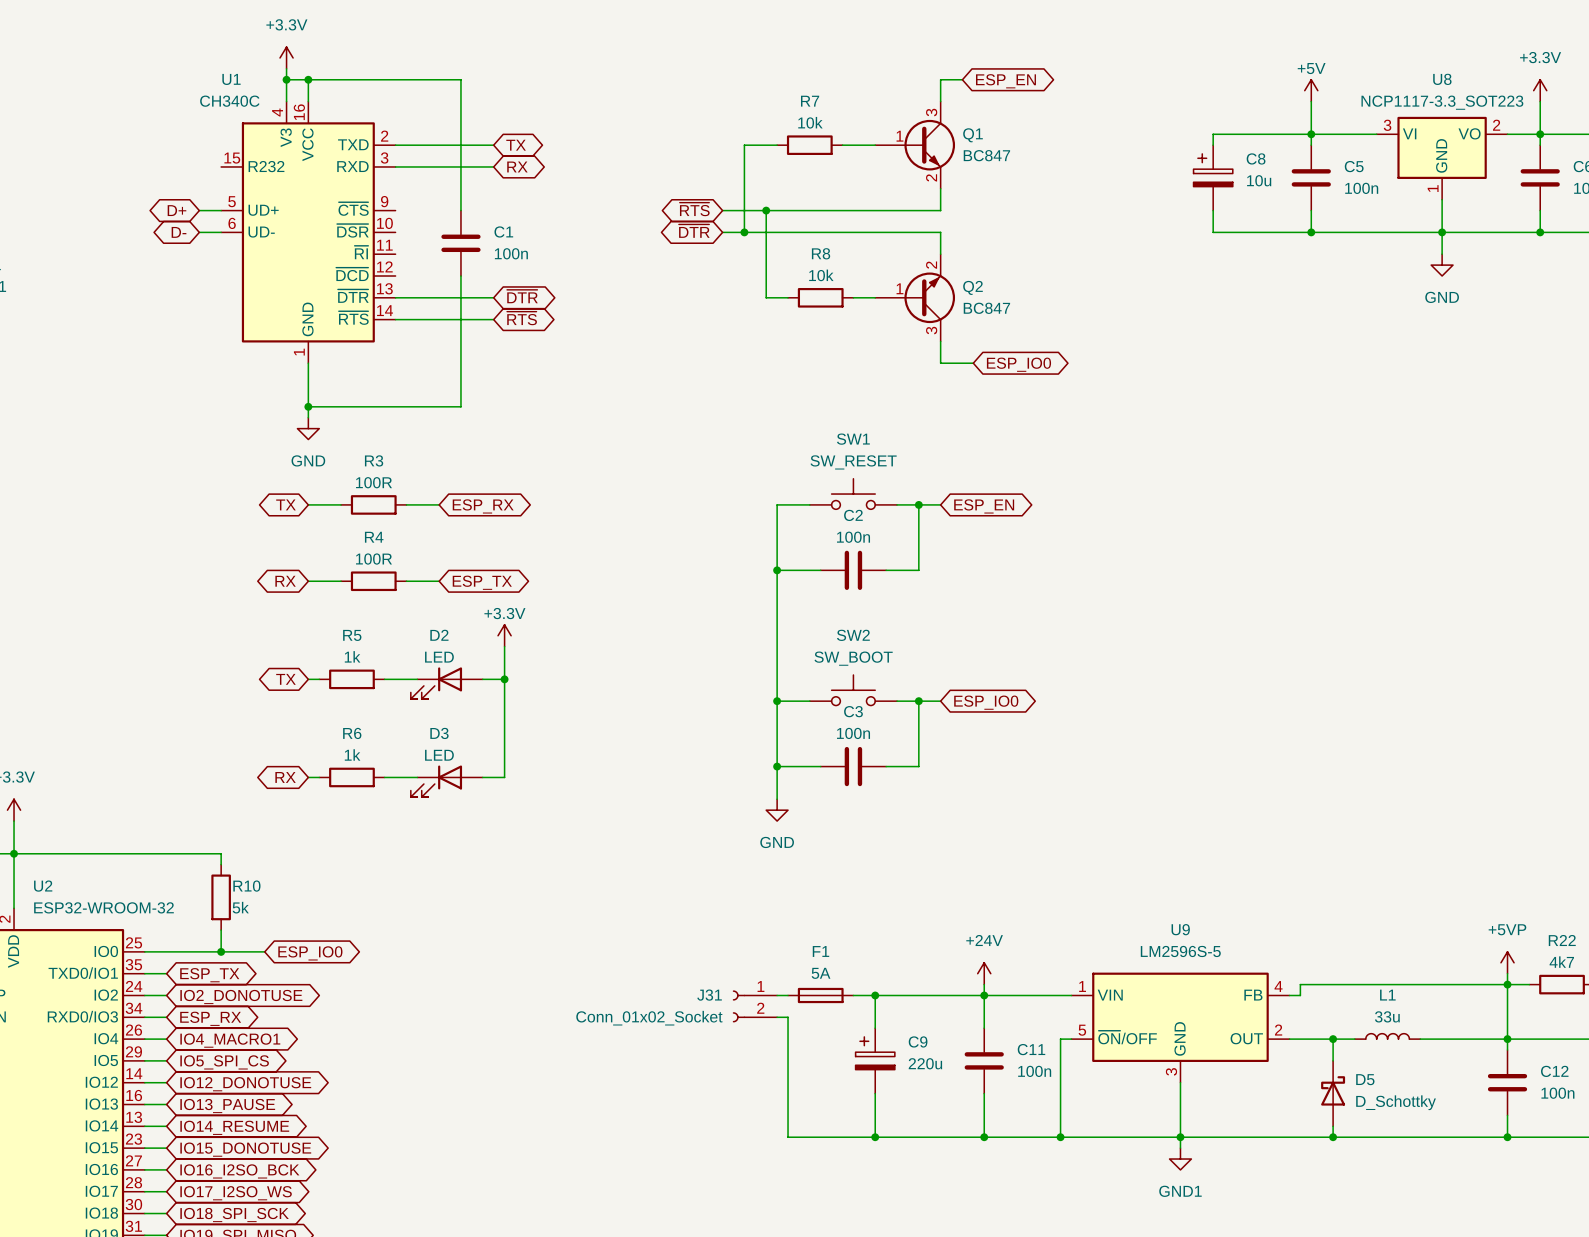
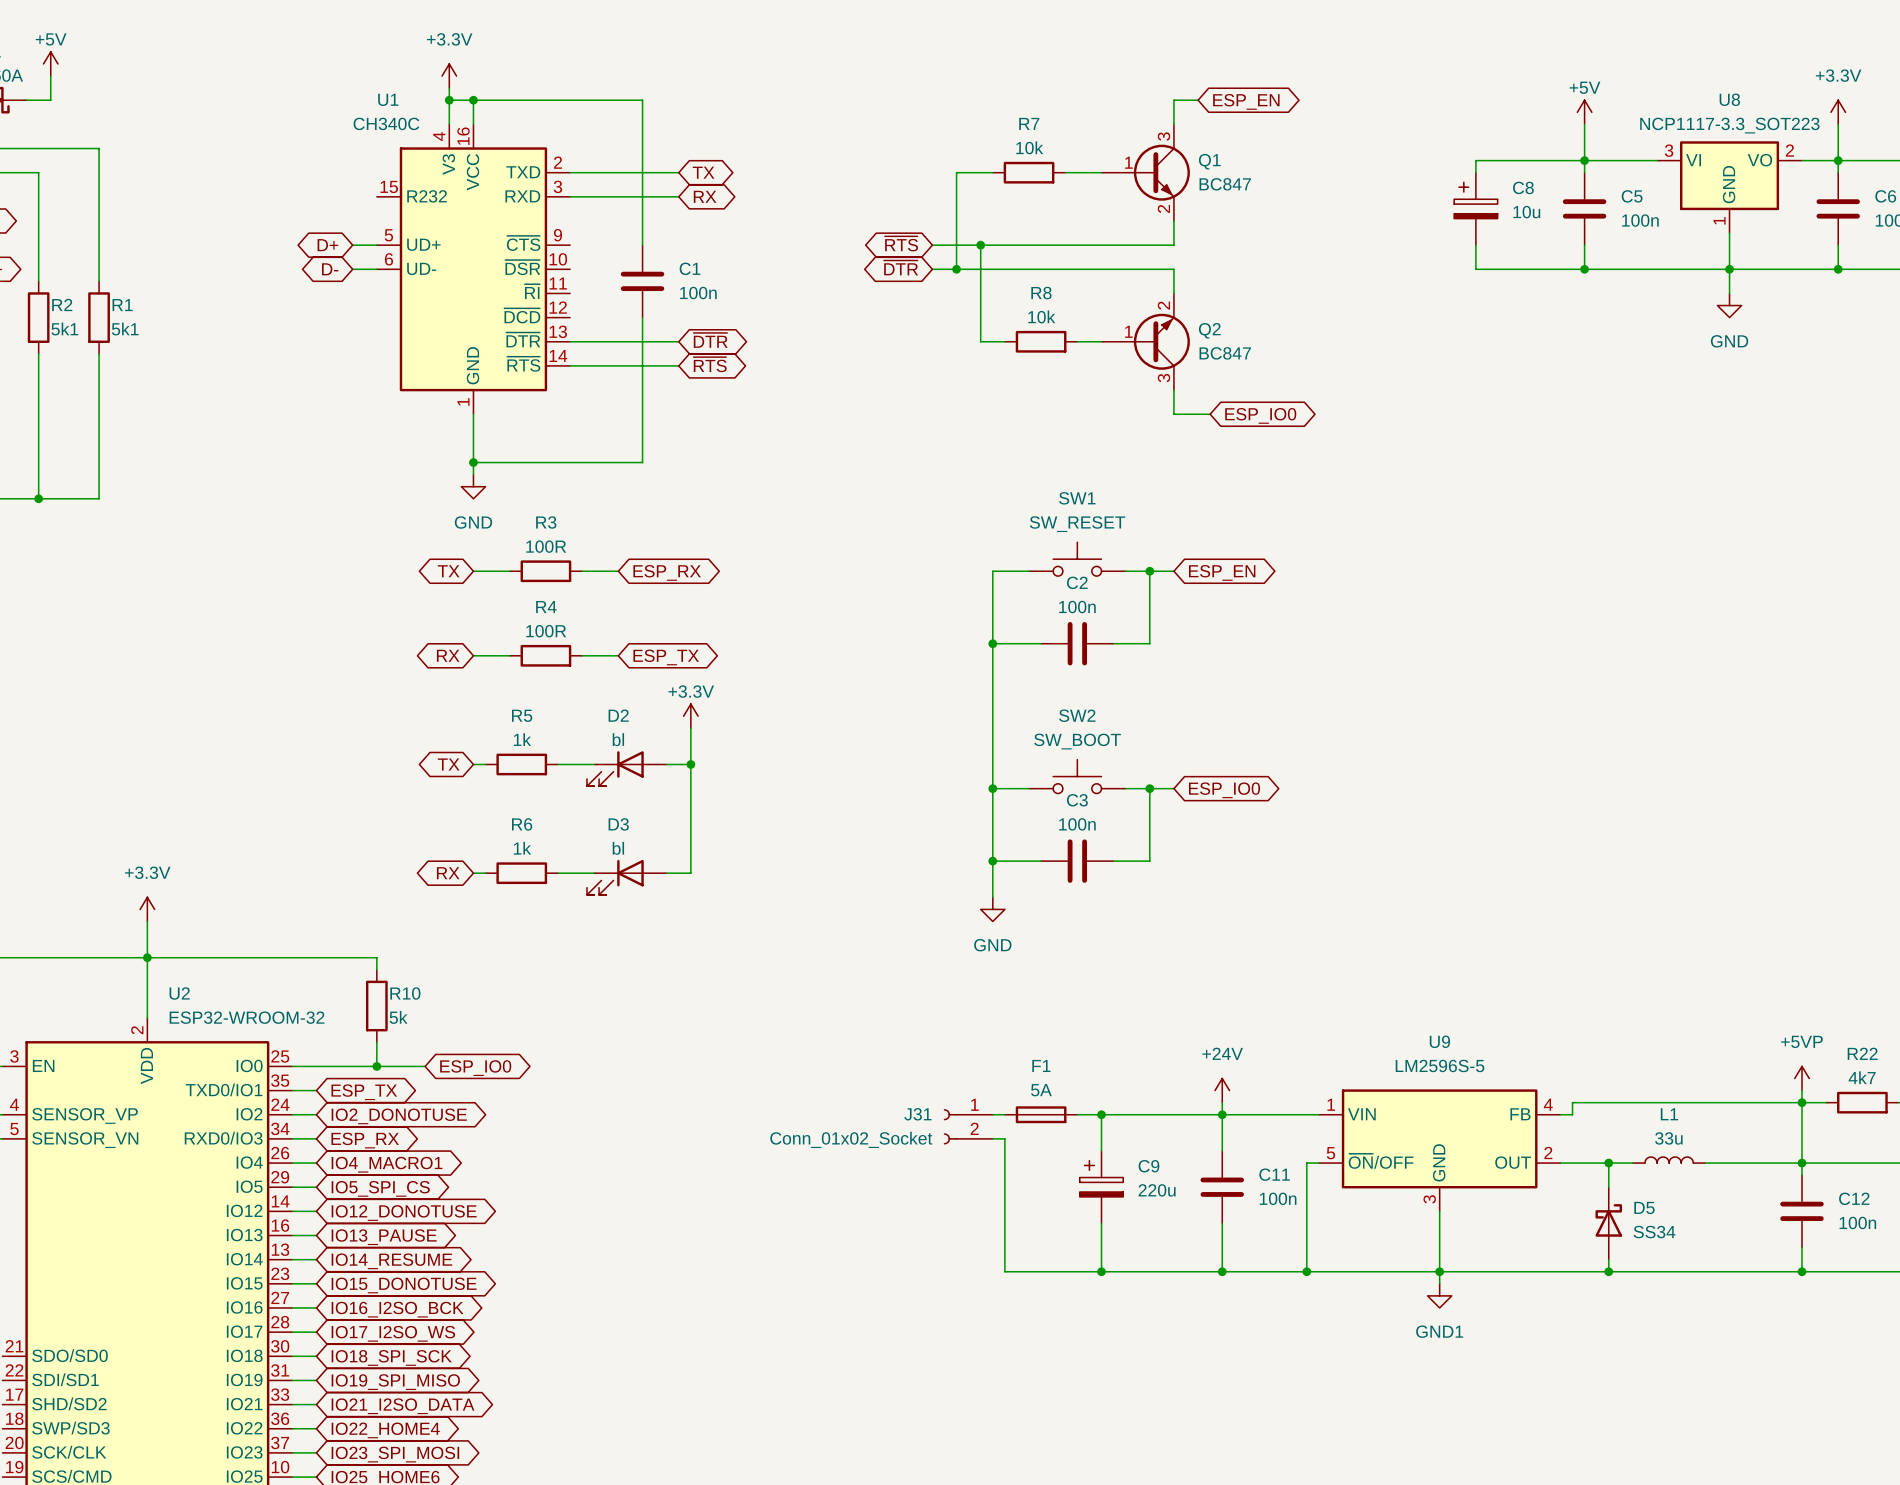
D2 value: LED (439, 657) -> bl (618, 739)
D3 value: LED (439, 755) -> bl (618, 848)
D5 value: D_Schottky (1396, 1102) -> SS34 (1654, 1232)

